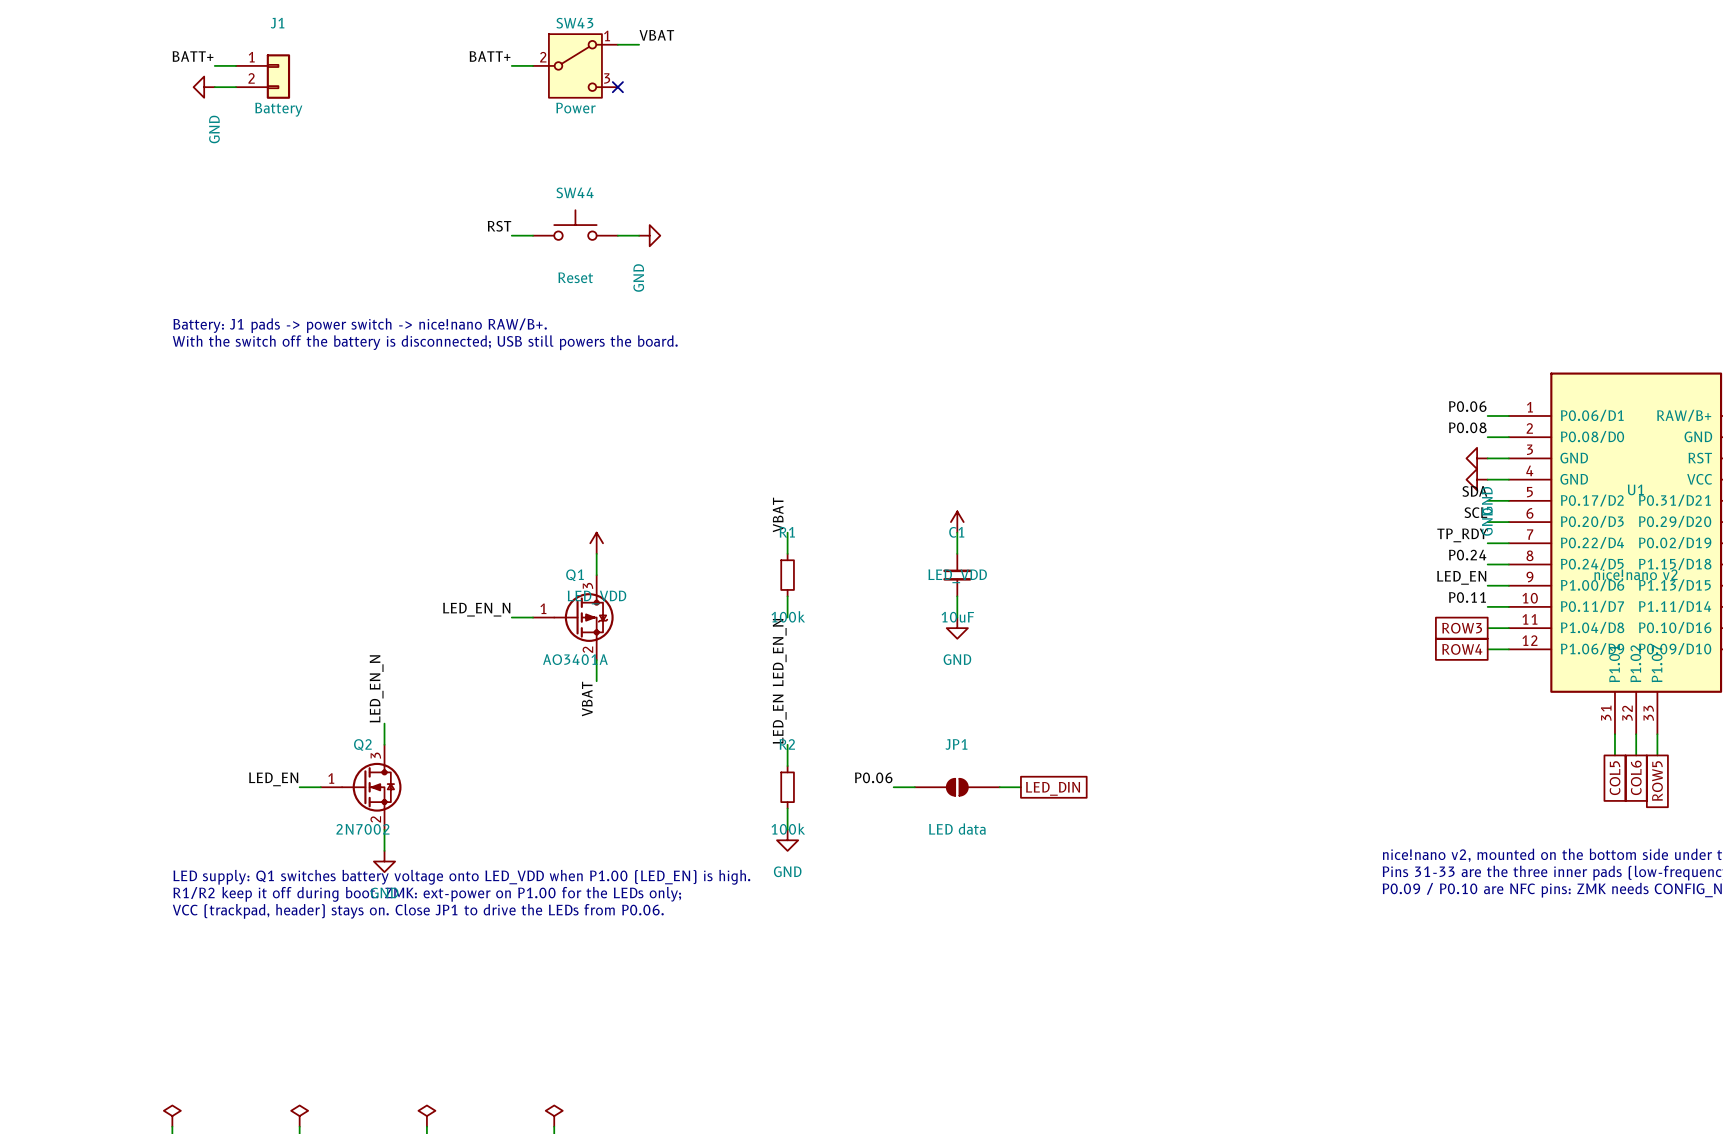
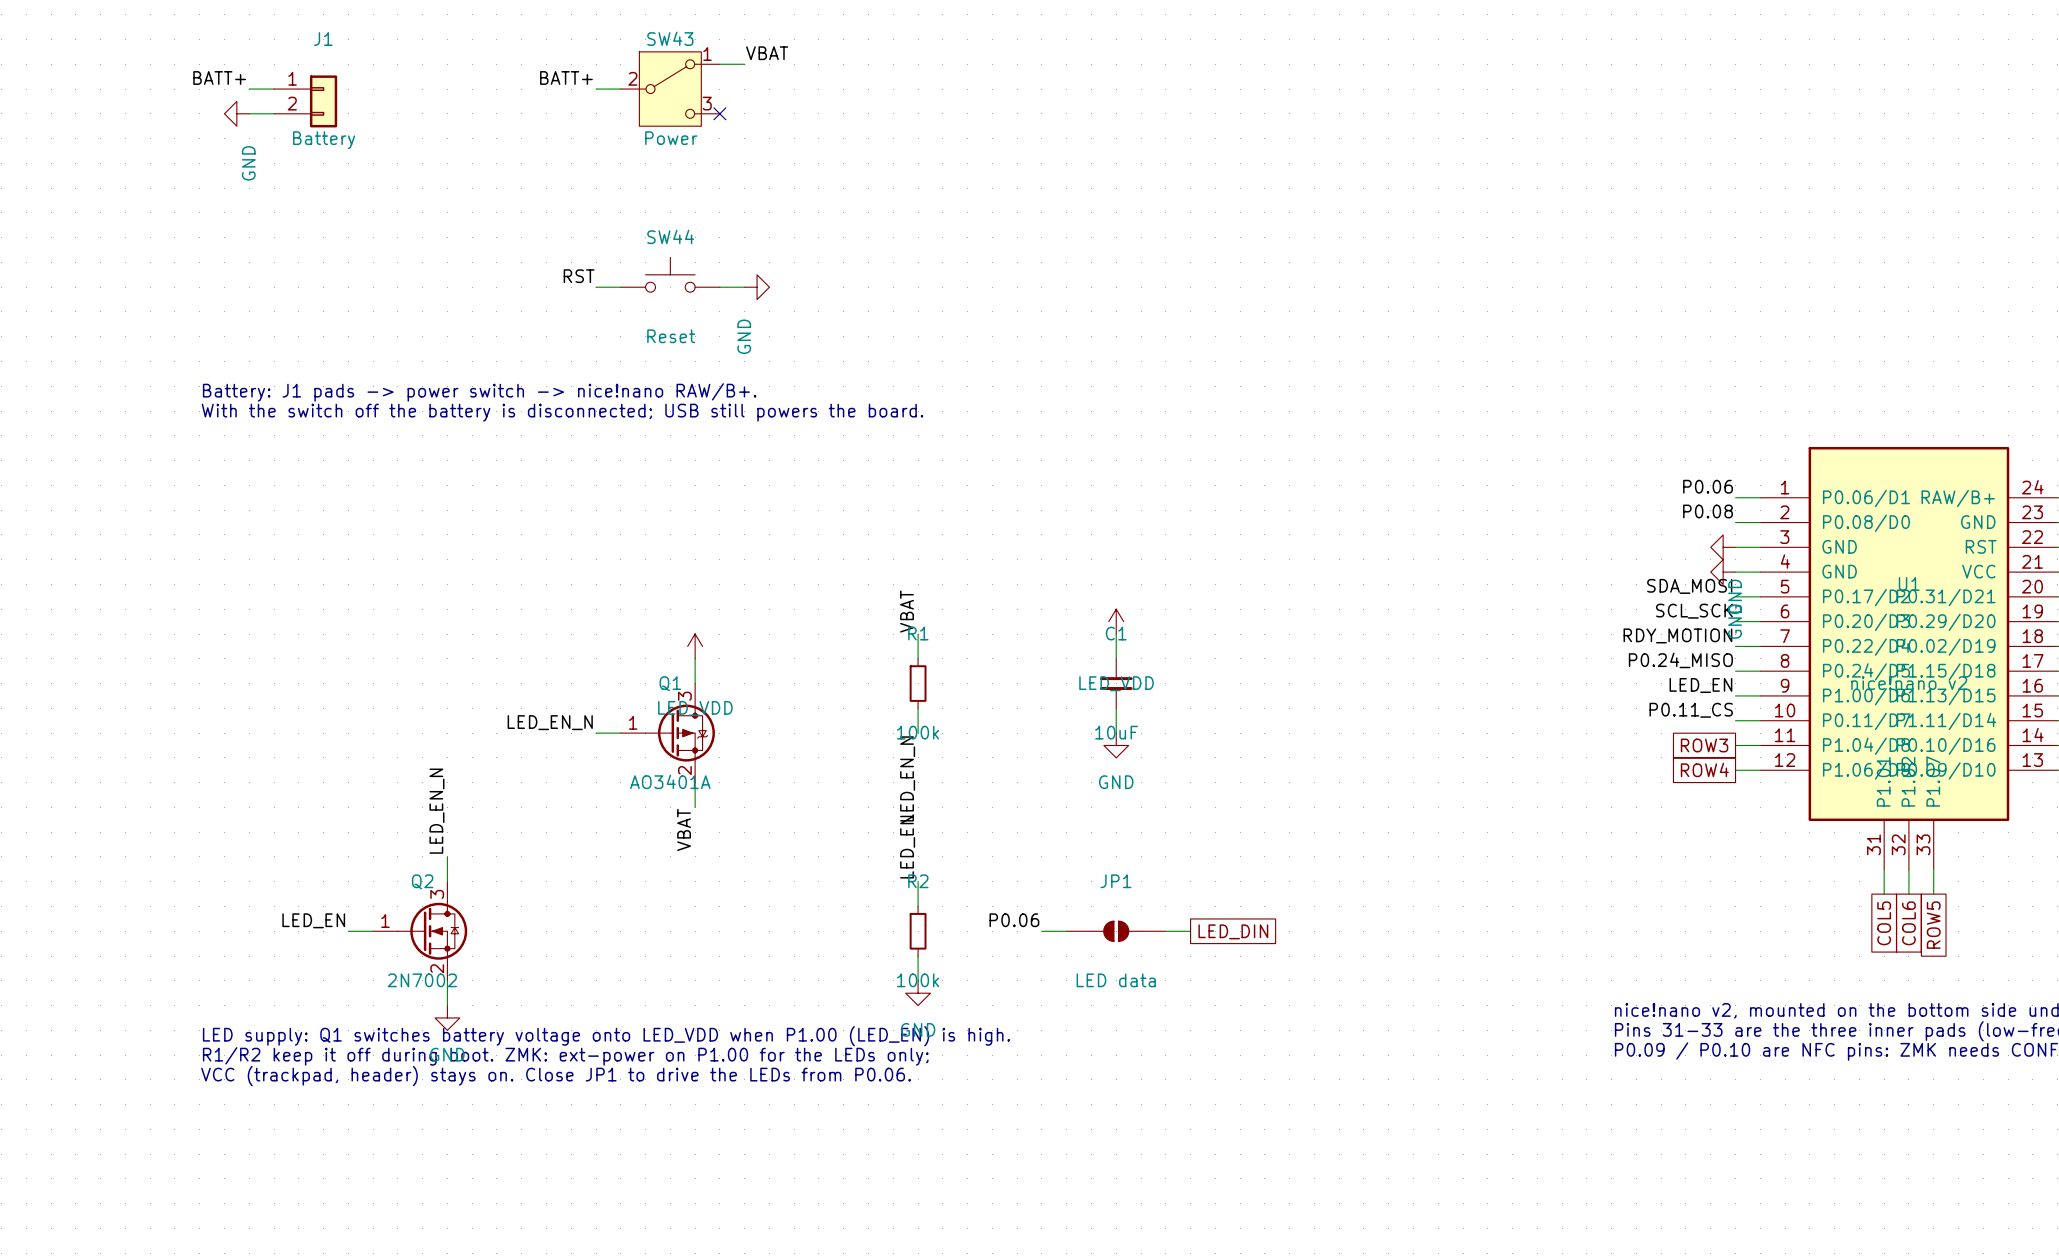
label: SDA (1474, 491) -> SDA_MOSI (1689, 586)
label: SCL (1475, 512) -> SCL_SCK (1694, 611)
label: TP_RDY (1462, 535) -> RDY_MOTION (1677, 635)
label: P0.24 (1467, 555) -> P0.24_MISO (1680, 660)
label: P0.11 (1467, 597) -> P0.11_CS (1691, 710)

